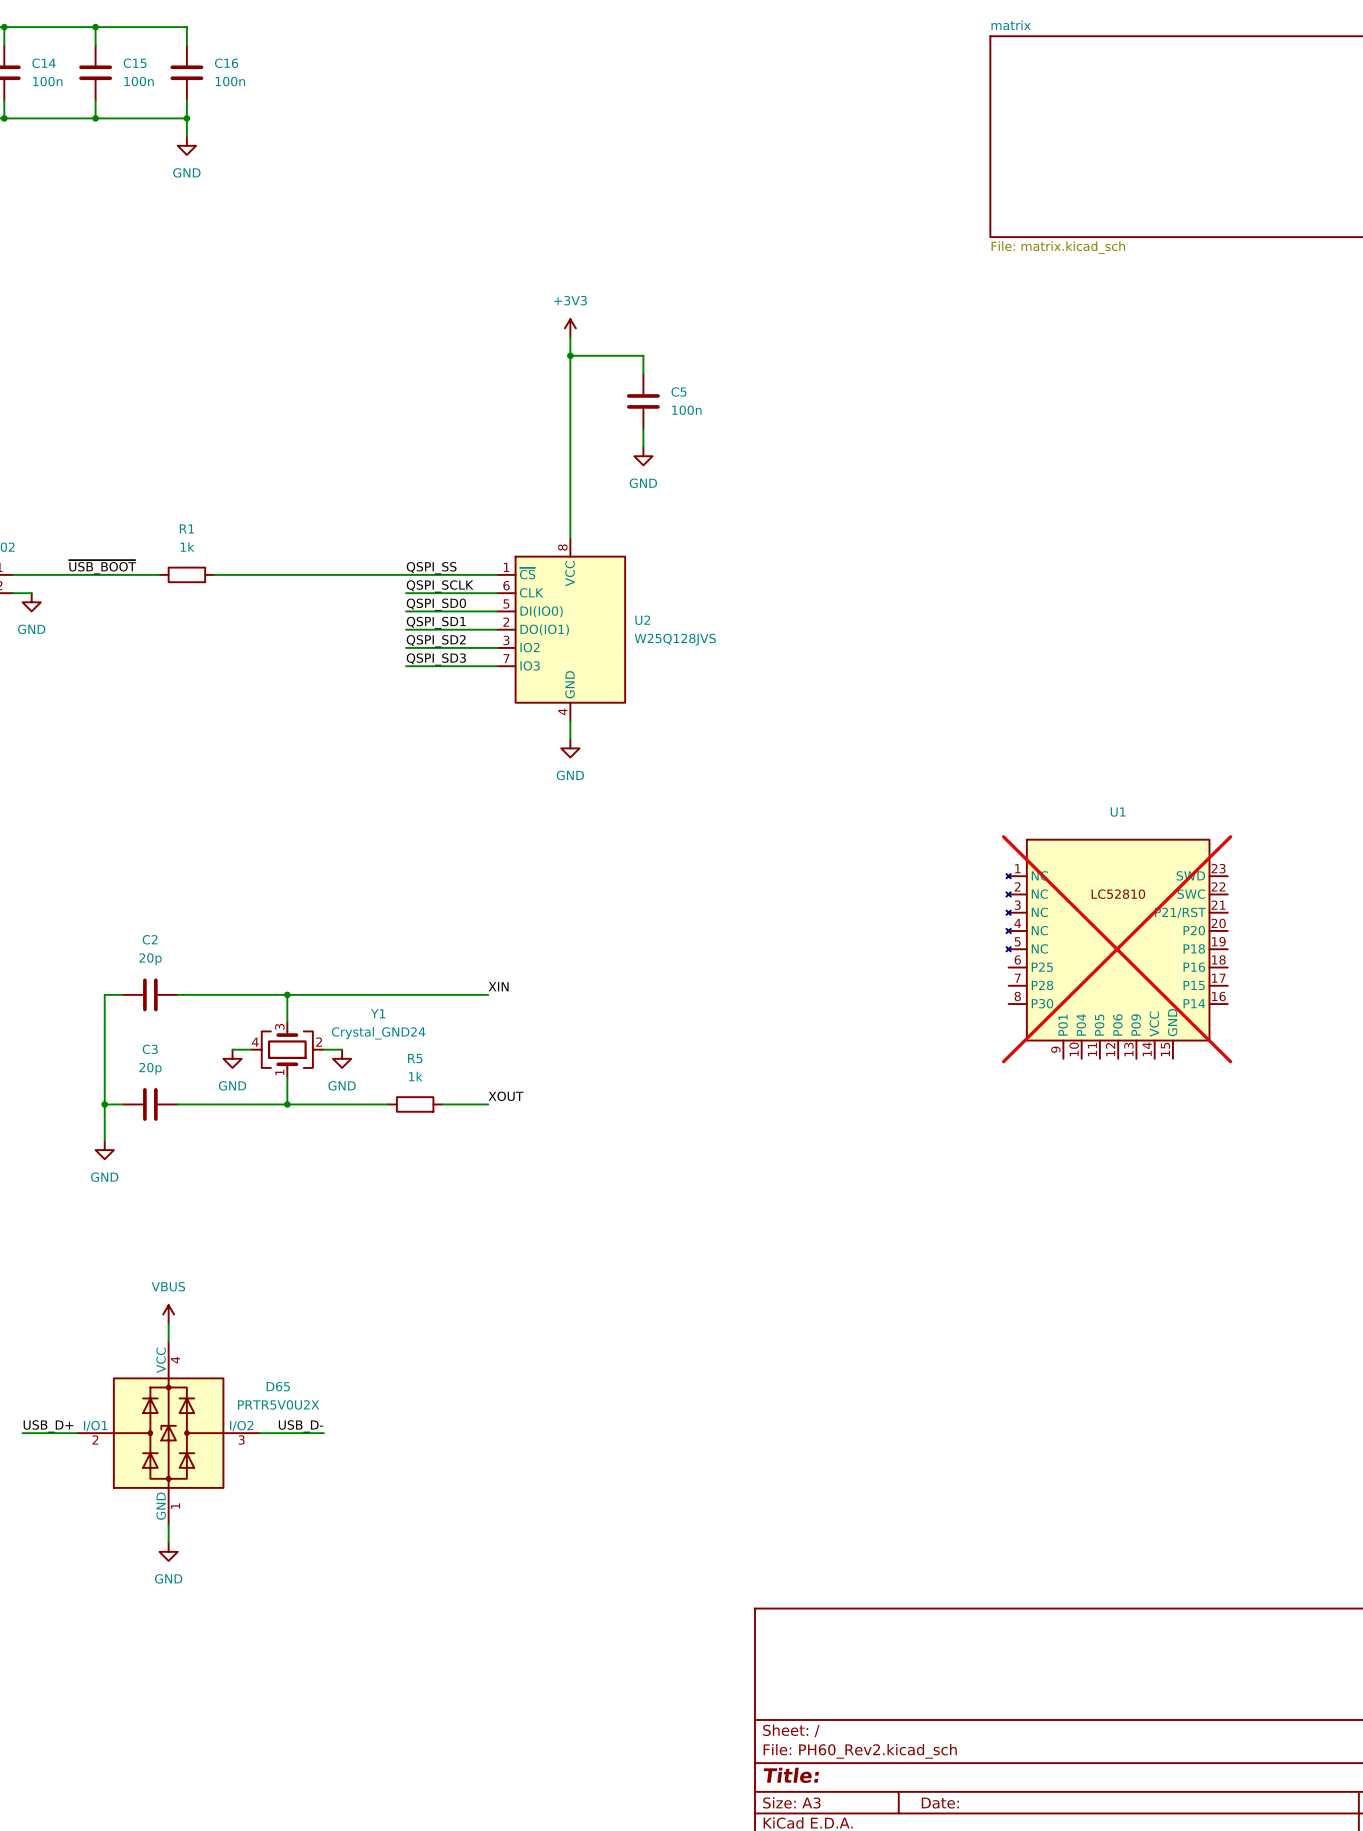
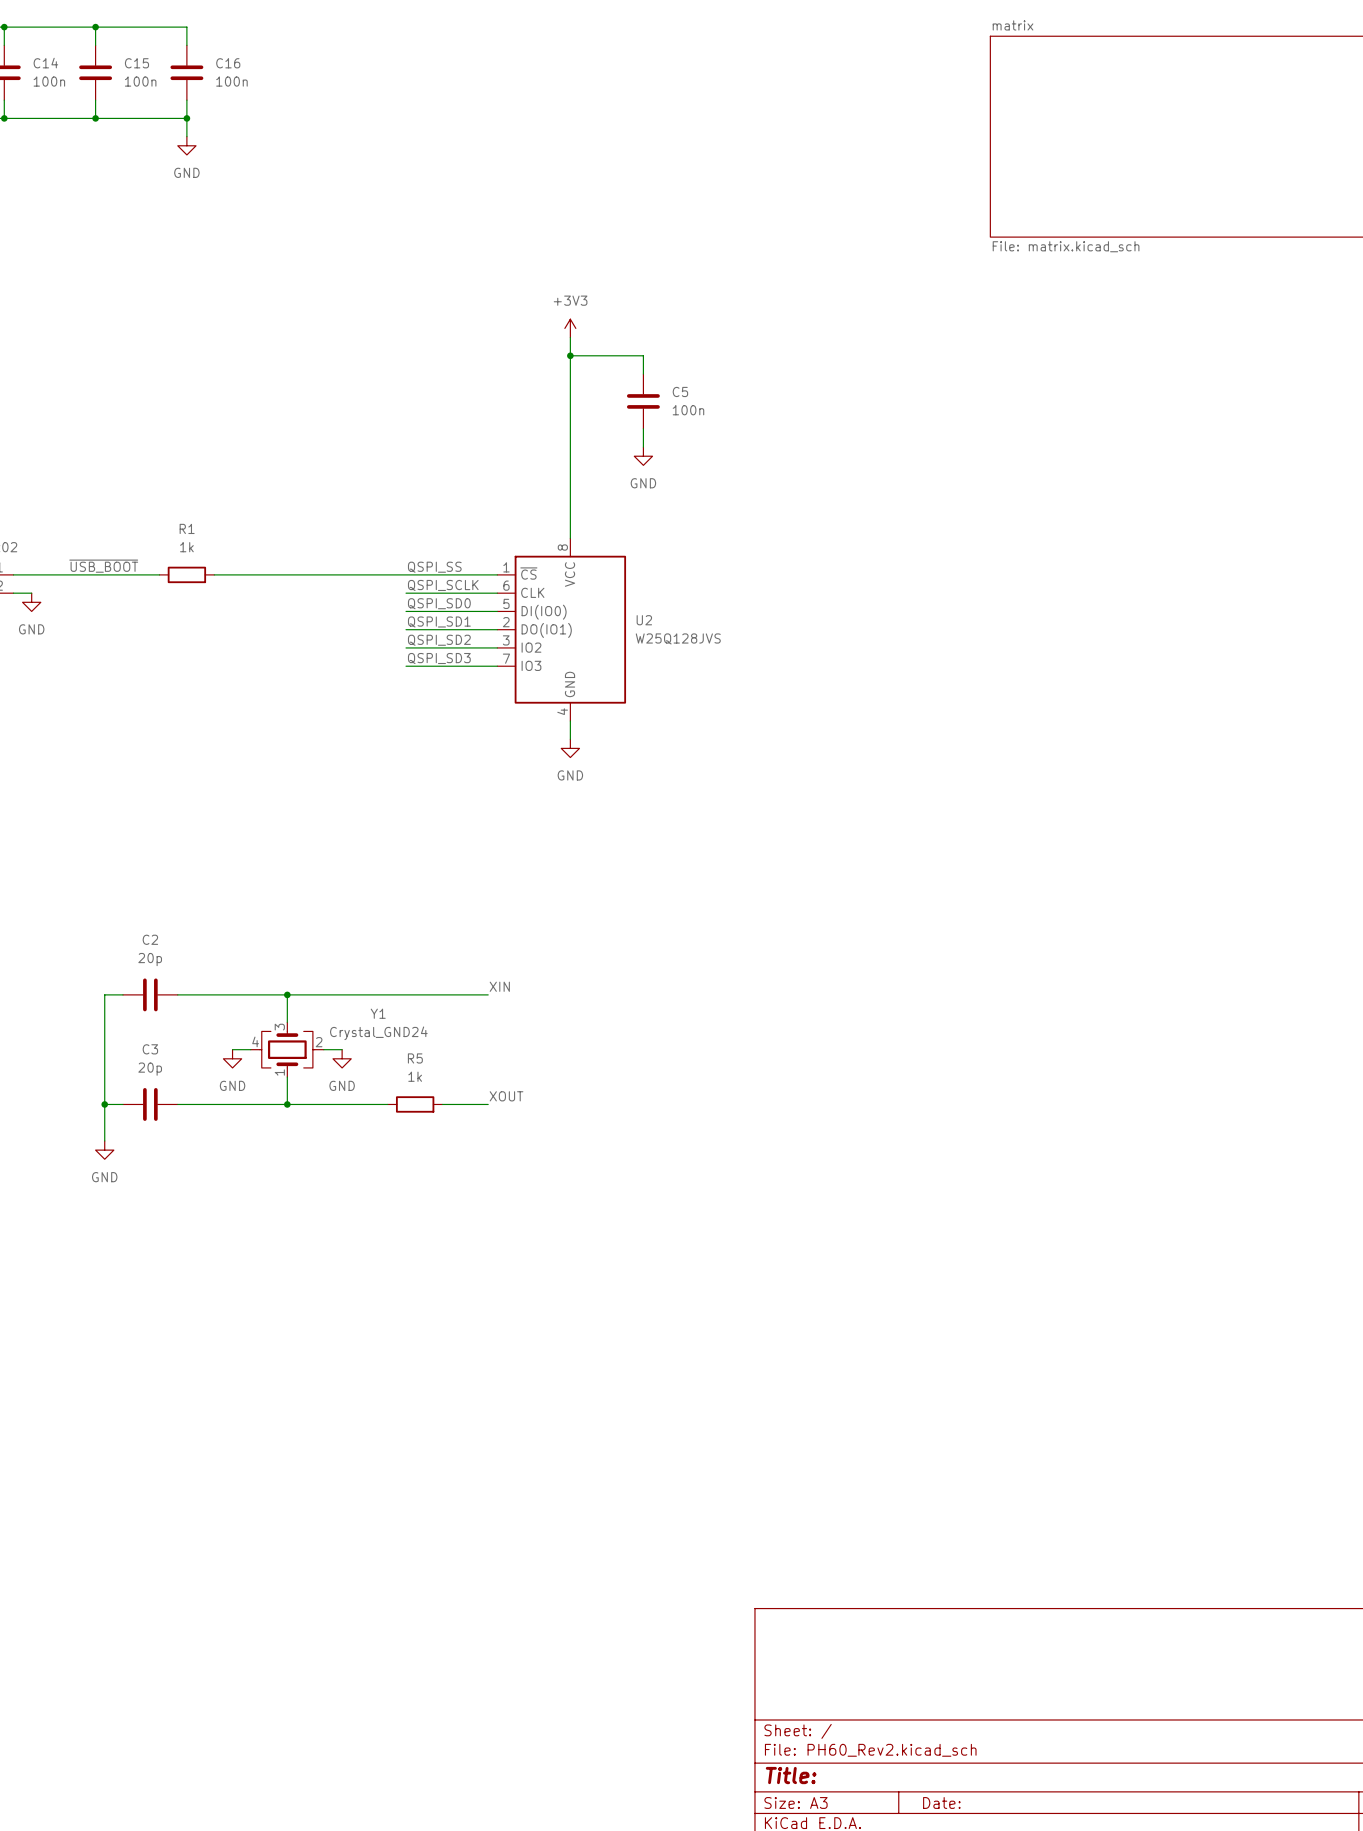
U1: (1117, 949) -> none
power symbol: VBUS (168, 1314) -> none
wire: (168, 1323) (168, 1341) -> none
label: USB_D+ (48, 1426) -> none
label: USB_D- (301, 1426) -> none
wire: (22, 1433) (77, 1433) -> none
D65: PRTR5V0U2X (168, 1433) -> none
wire: (259, 1433) (323, 1433) -> none
wire: (168, 1524) (168, 1542) -> none
power symbol: GND (168, 1551) -> none

